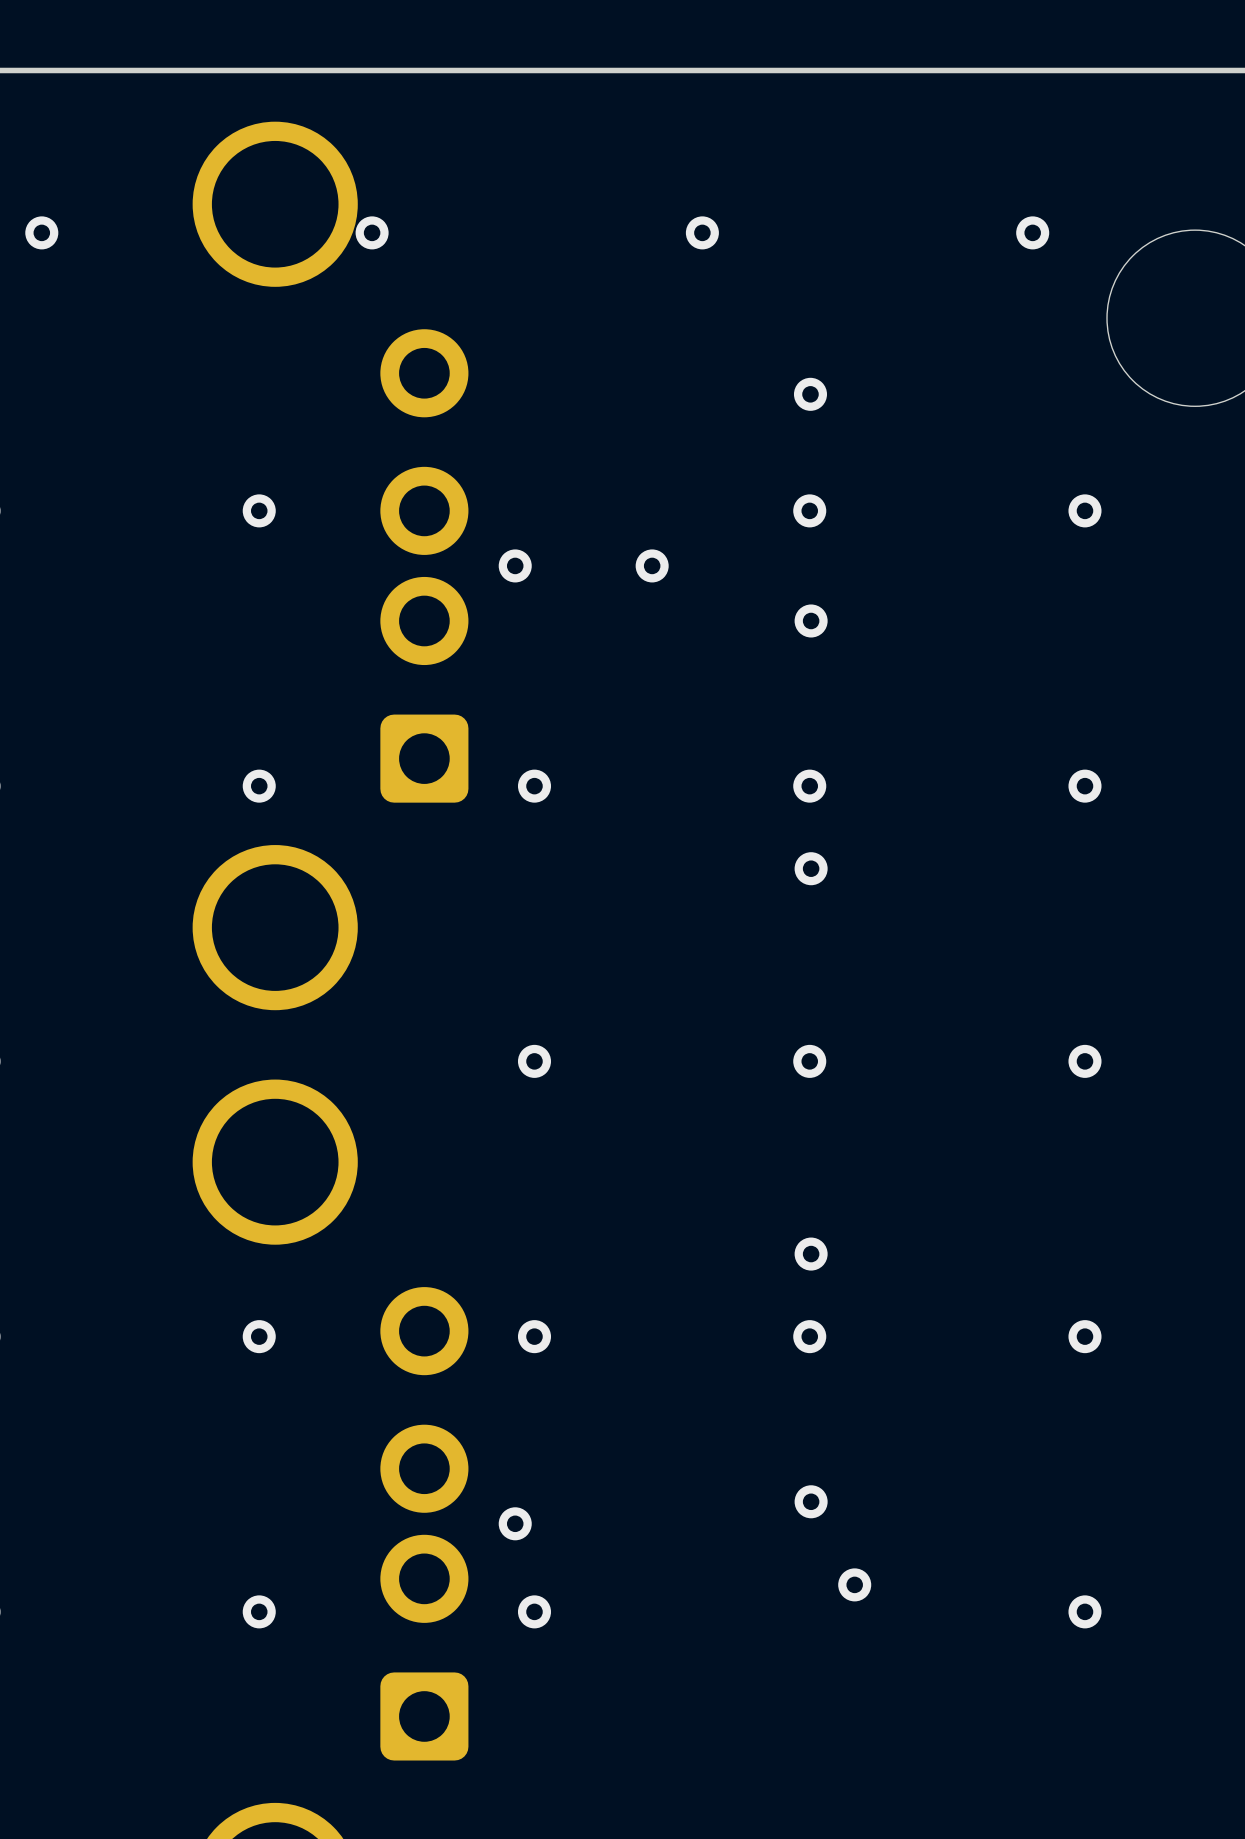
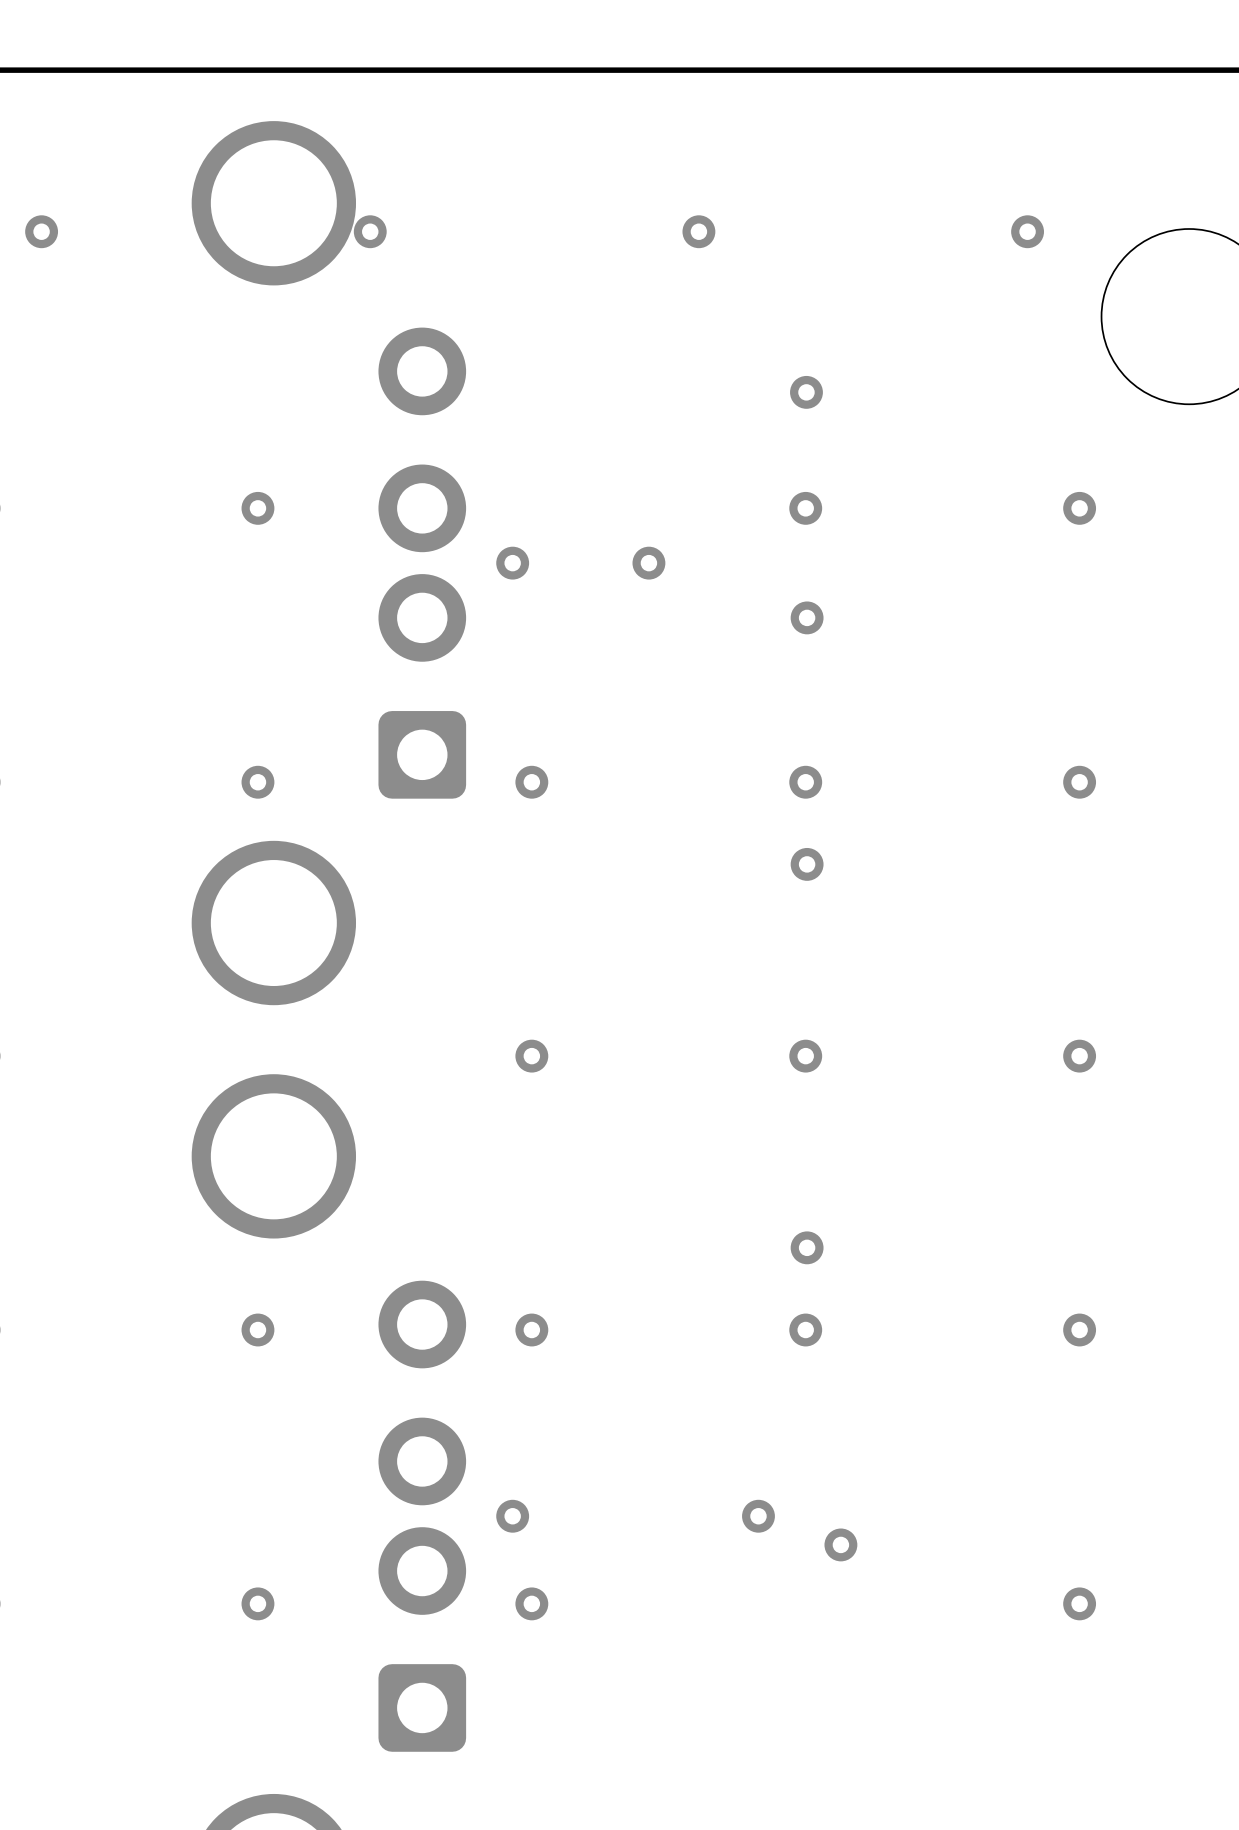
via: (811, 1501) -> none
via: none -> (758, 1516)
via position: (854, 1584) -> (840, 1544)

